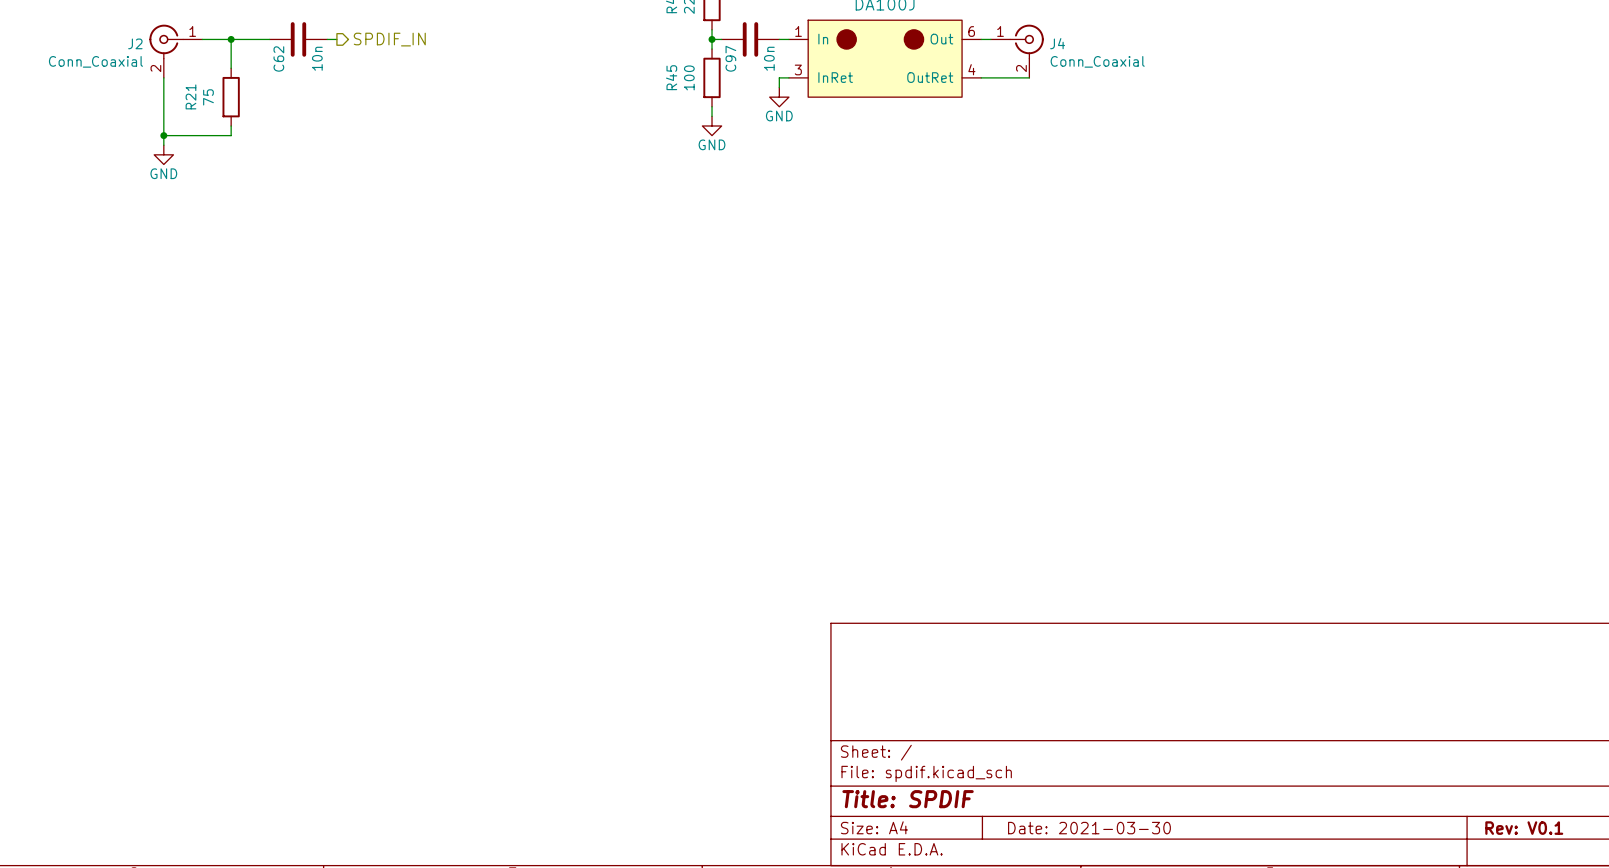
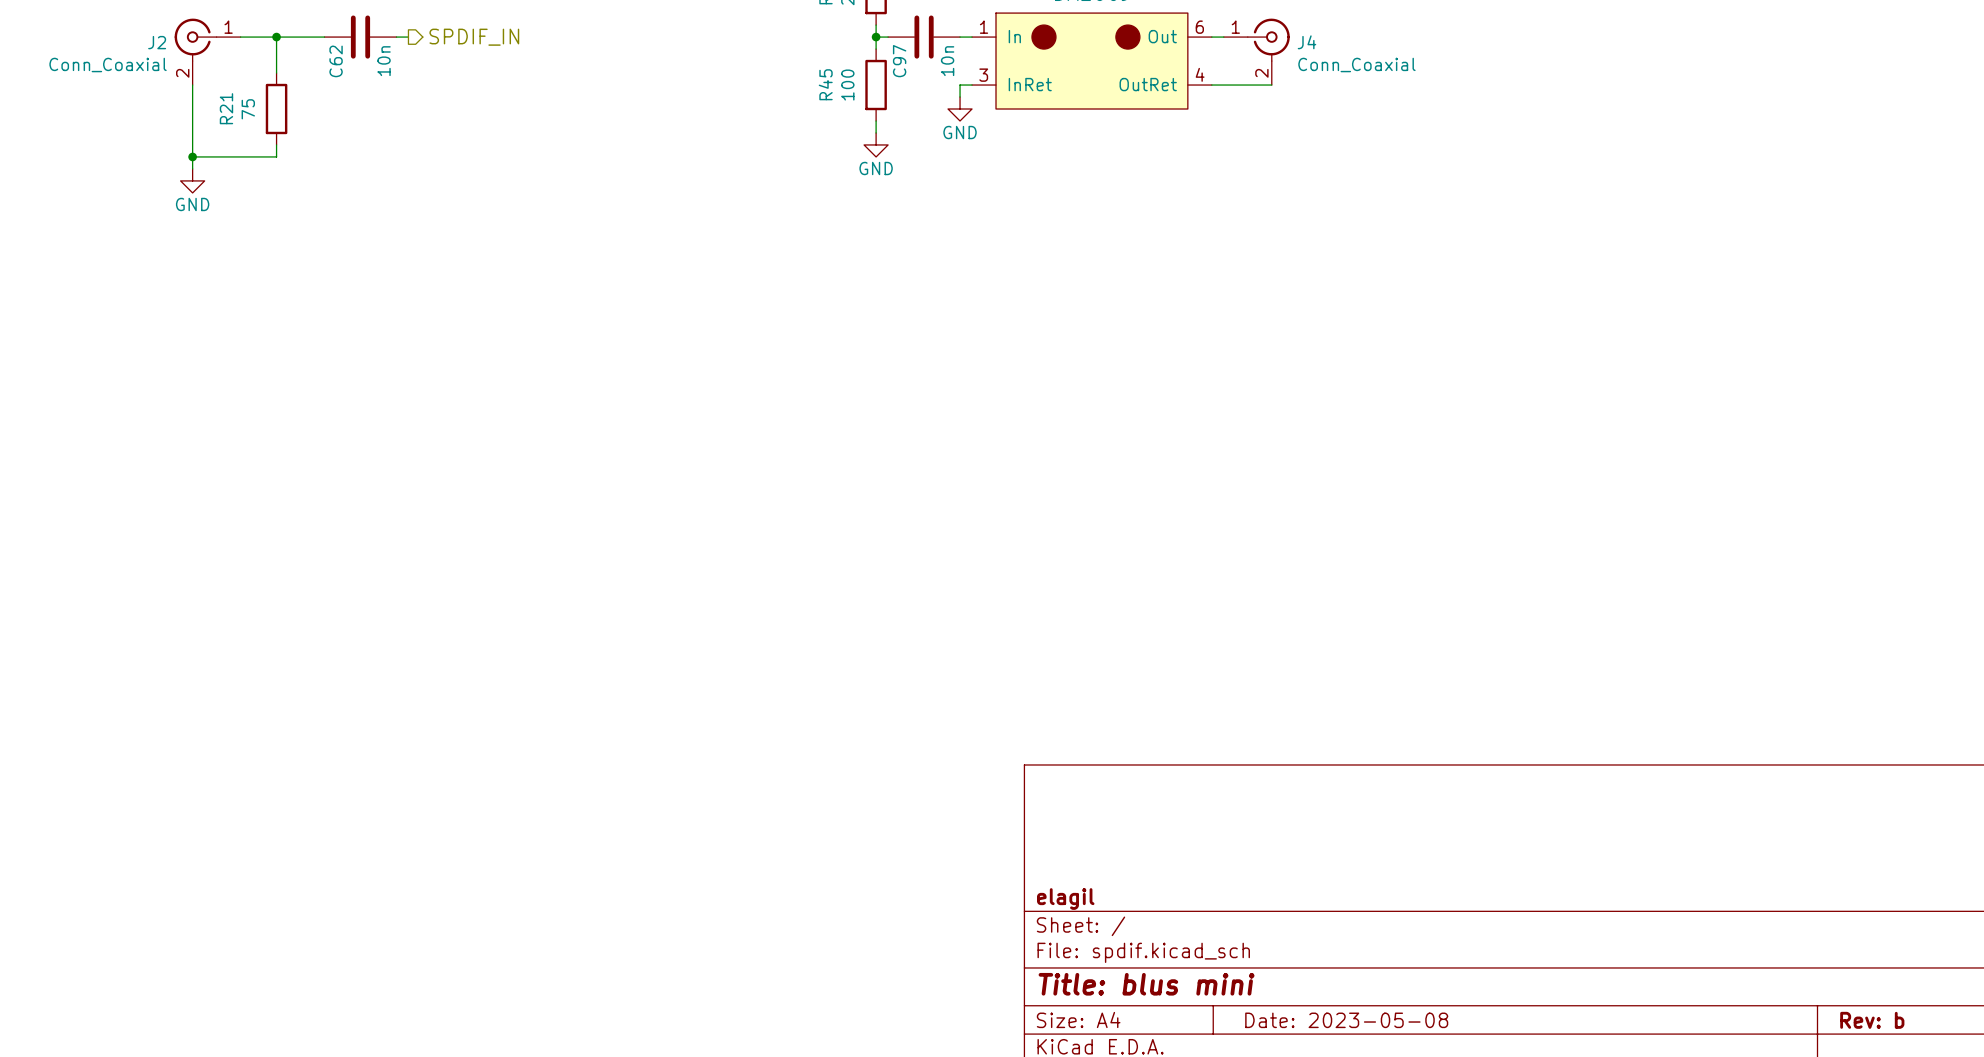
title block: none -> elagil (1065, 899)
title block: Title: SPDIF (908, 799) -> Title: blus mini (1146, 984)
title block: Date: 2021-03-30 (1089, 828) -> Date: 2023-05-08 (1346, 1020)
title block: Rev: V0.1 (1524, 828) -> Rev: b (1872, 1020)

